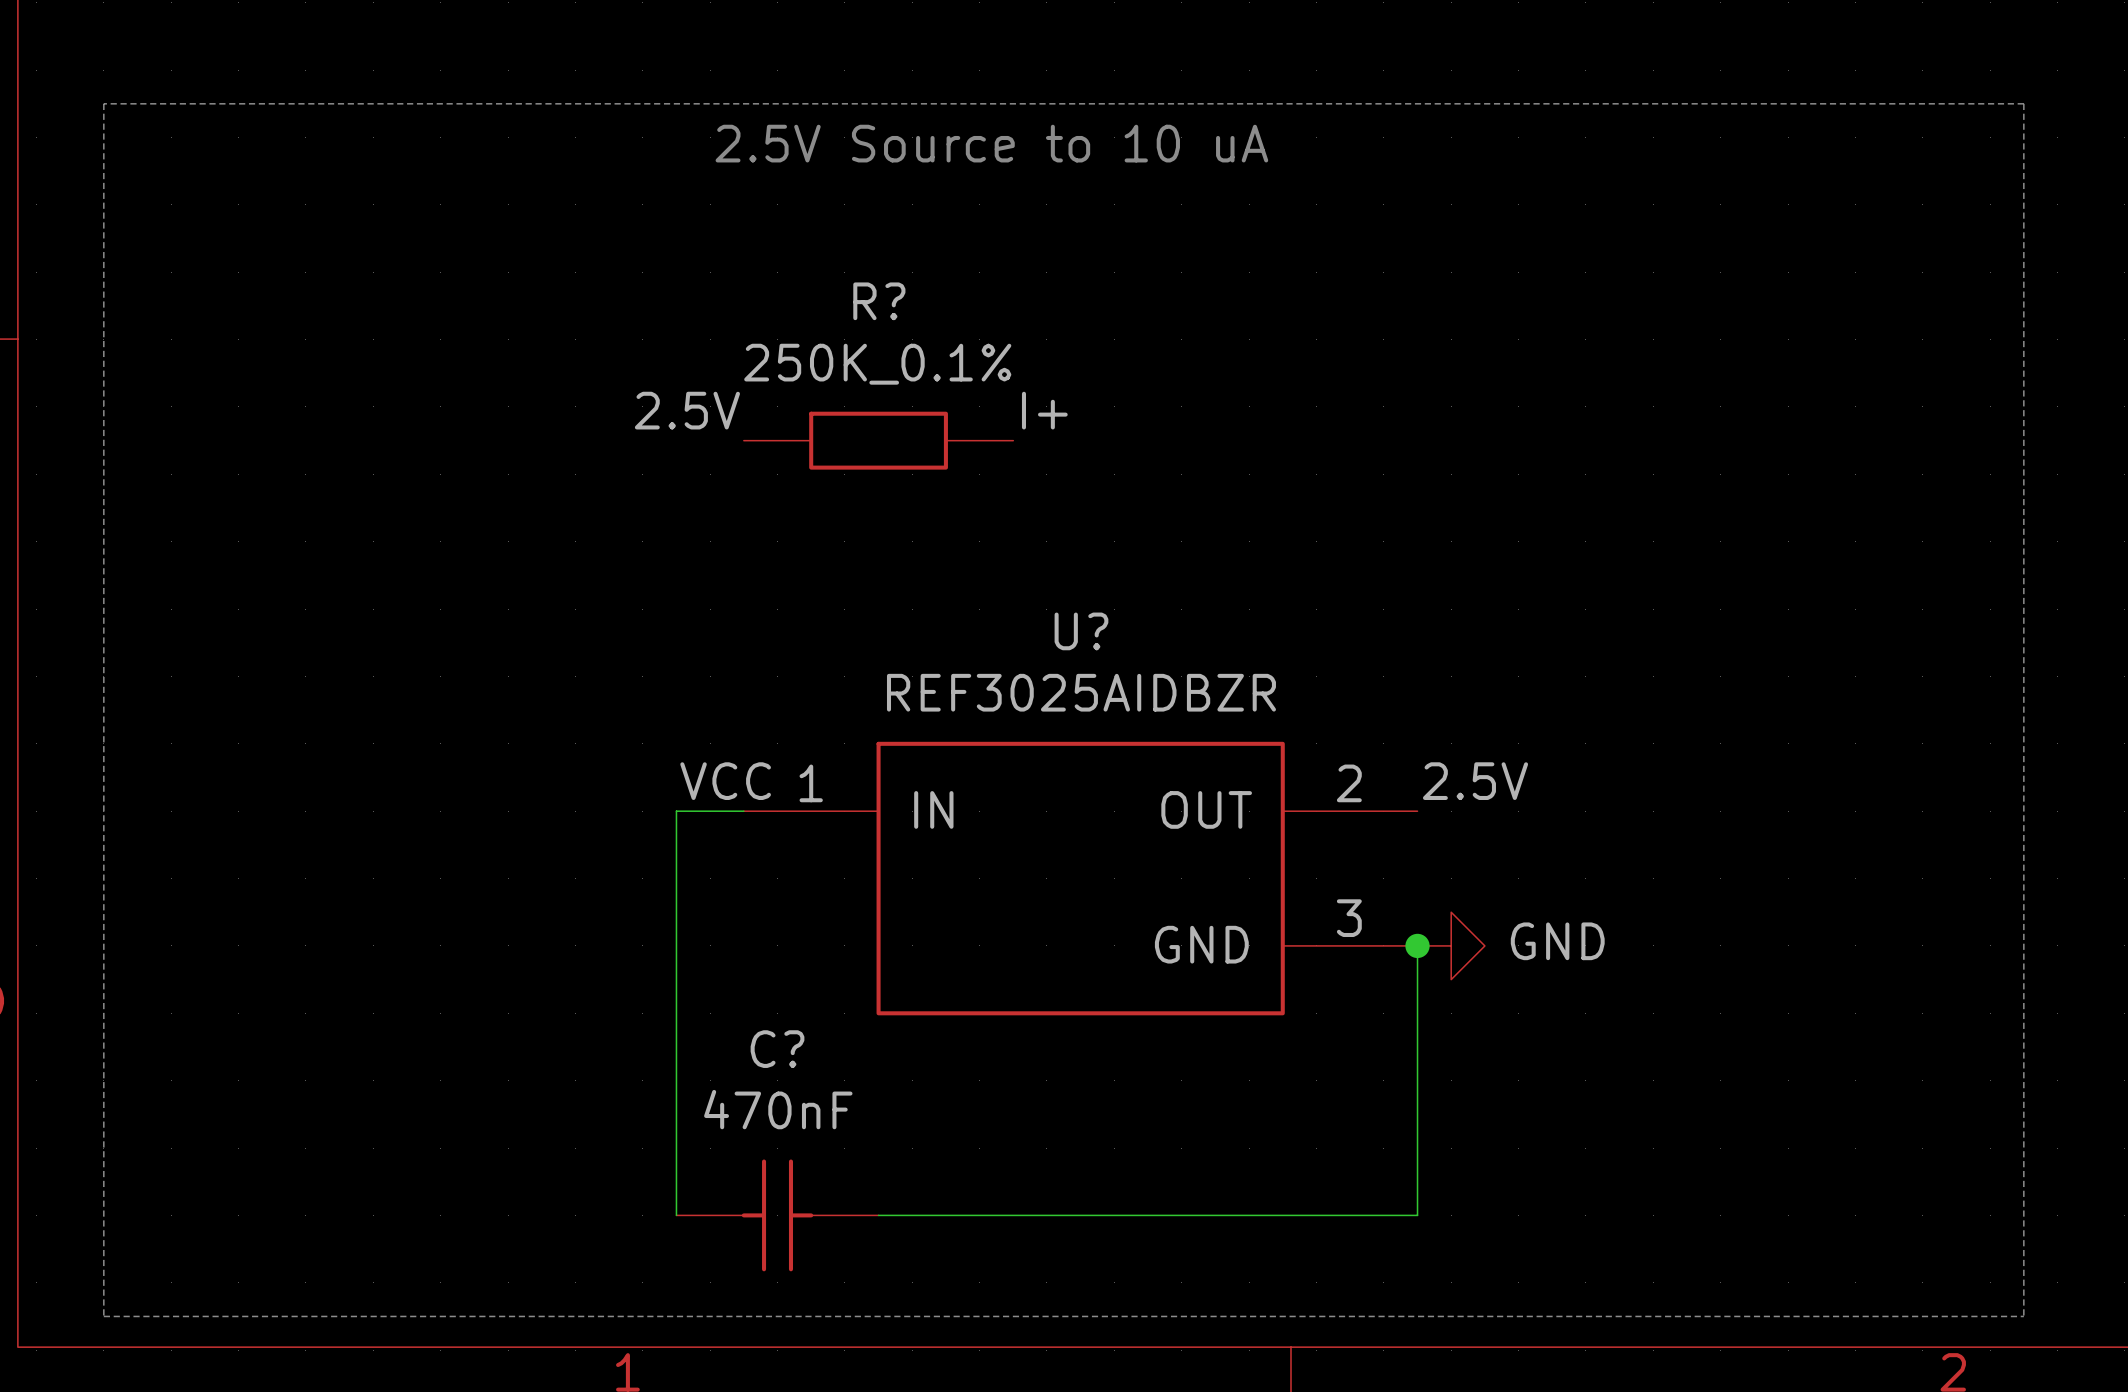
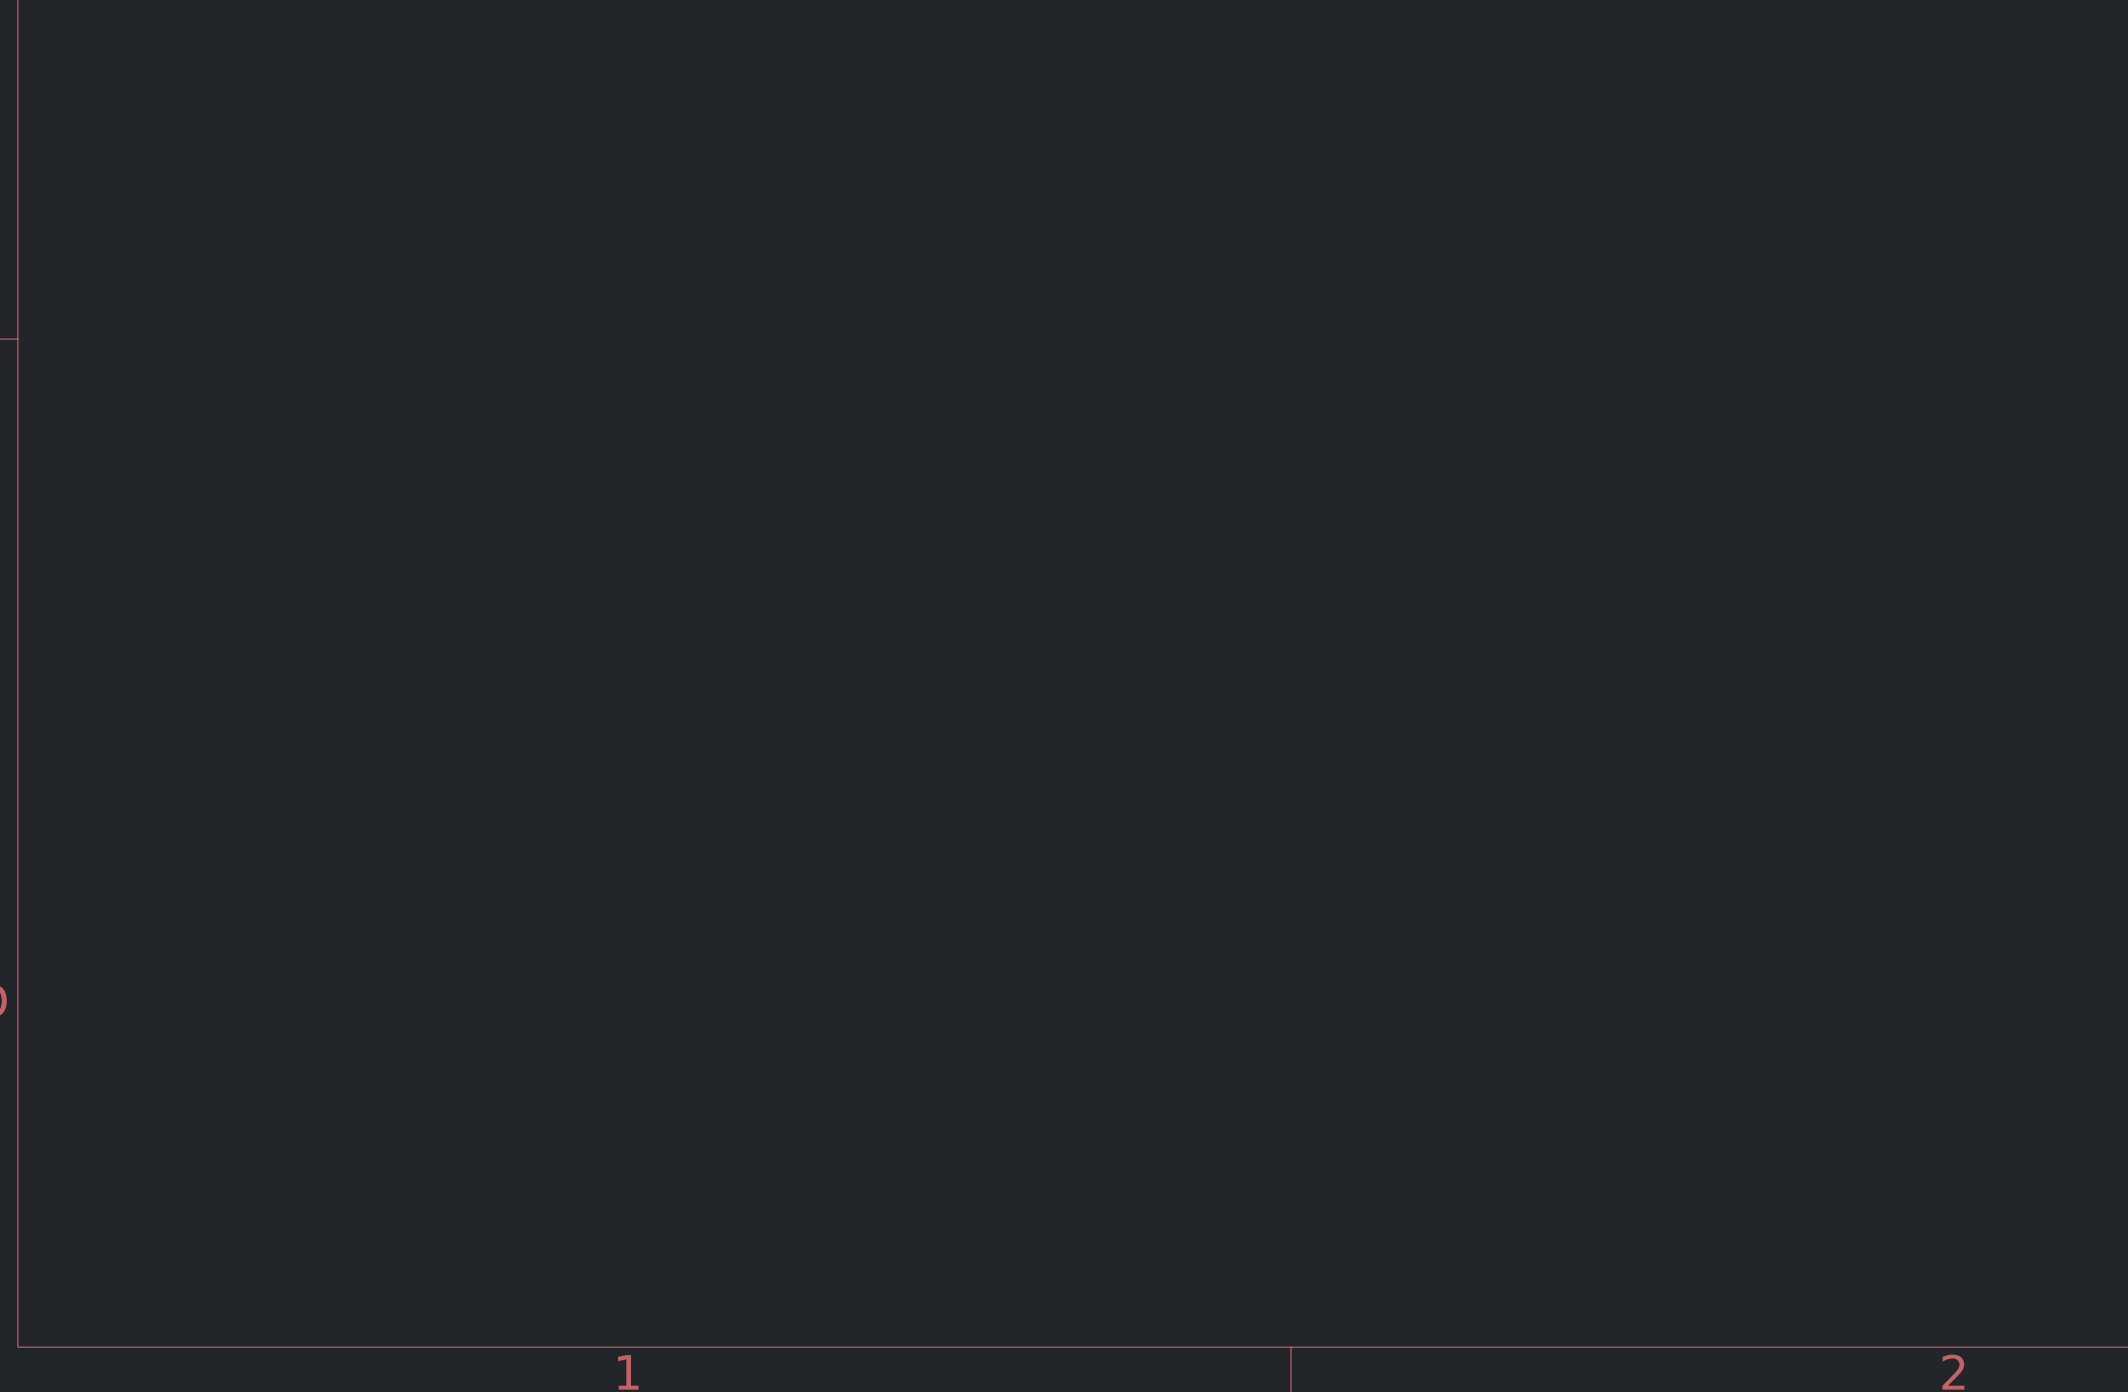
line: (103, 103) (103, 1316) (2023, 1316) (2023, 103) (103, 103) -> none
text: 2.5V Source to 10 uA (991, 143) -> none
label: 2.5V (687, 410) -> none
label: I+ (1044, 410) -> none
R?: 250K_0.1% (878, 440) -> none
label: VCC (725, 781) -> none
label: 2.5V (1475, 781) -> none
wire: (743, 811) (676, 811) (676, 1215) -> none
U?: REF3025AIDBZR (1080, 878) -> none
wire: (1417, 945) (1417, 1215) (878, 1215) -> none
junction: (1417, 945) -> none
power symbol: GND (1451, 945) -> none
C?: 470nF (777, 1215) -> none

